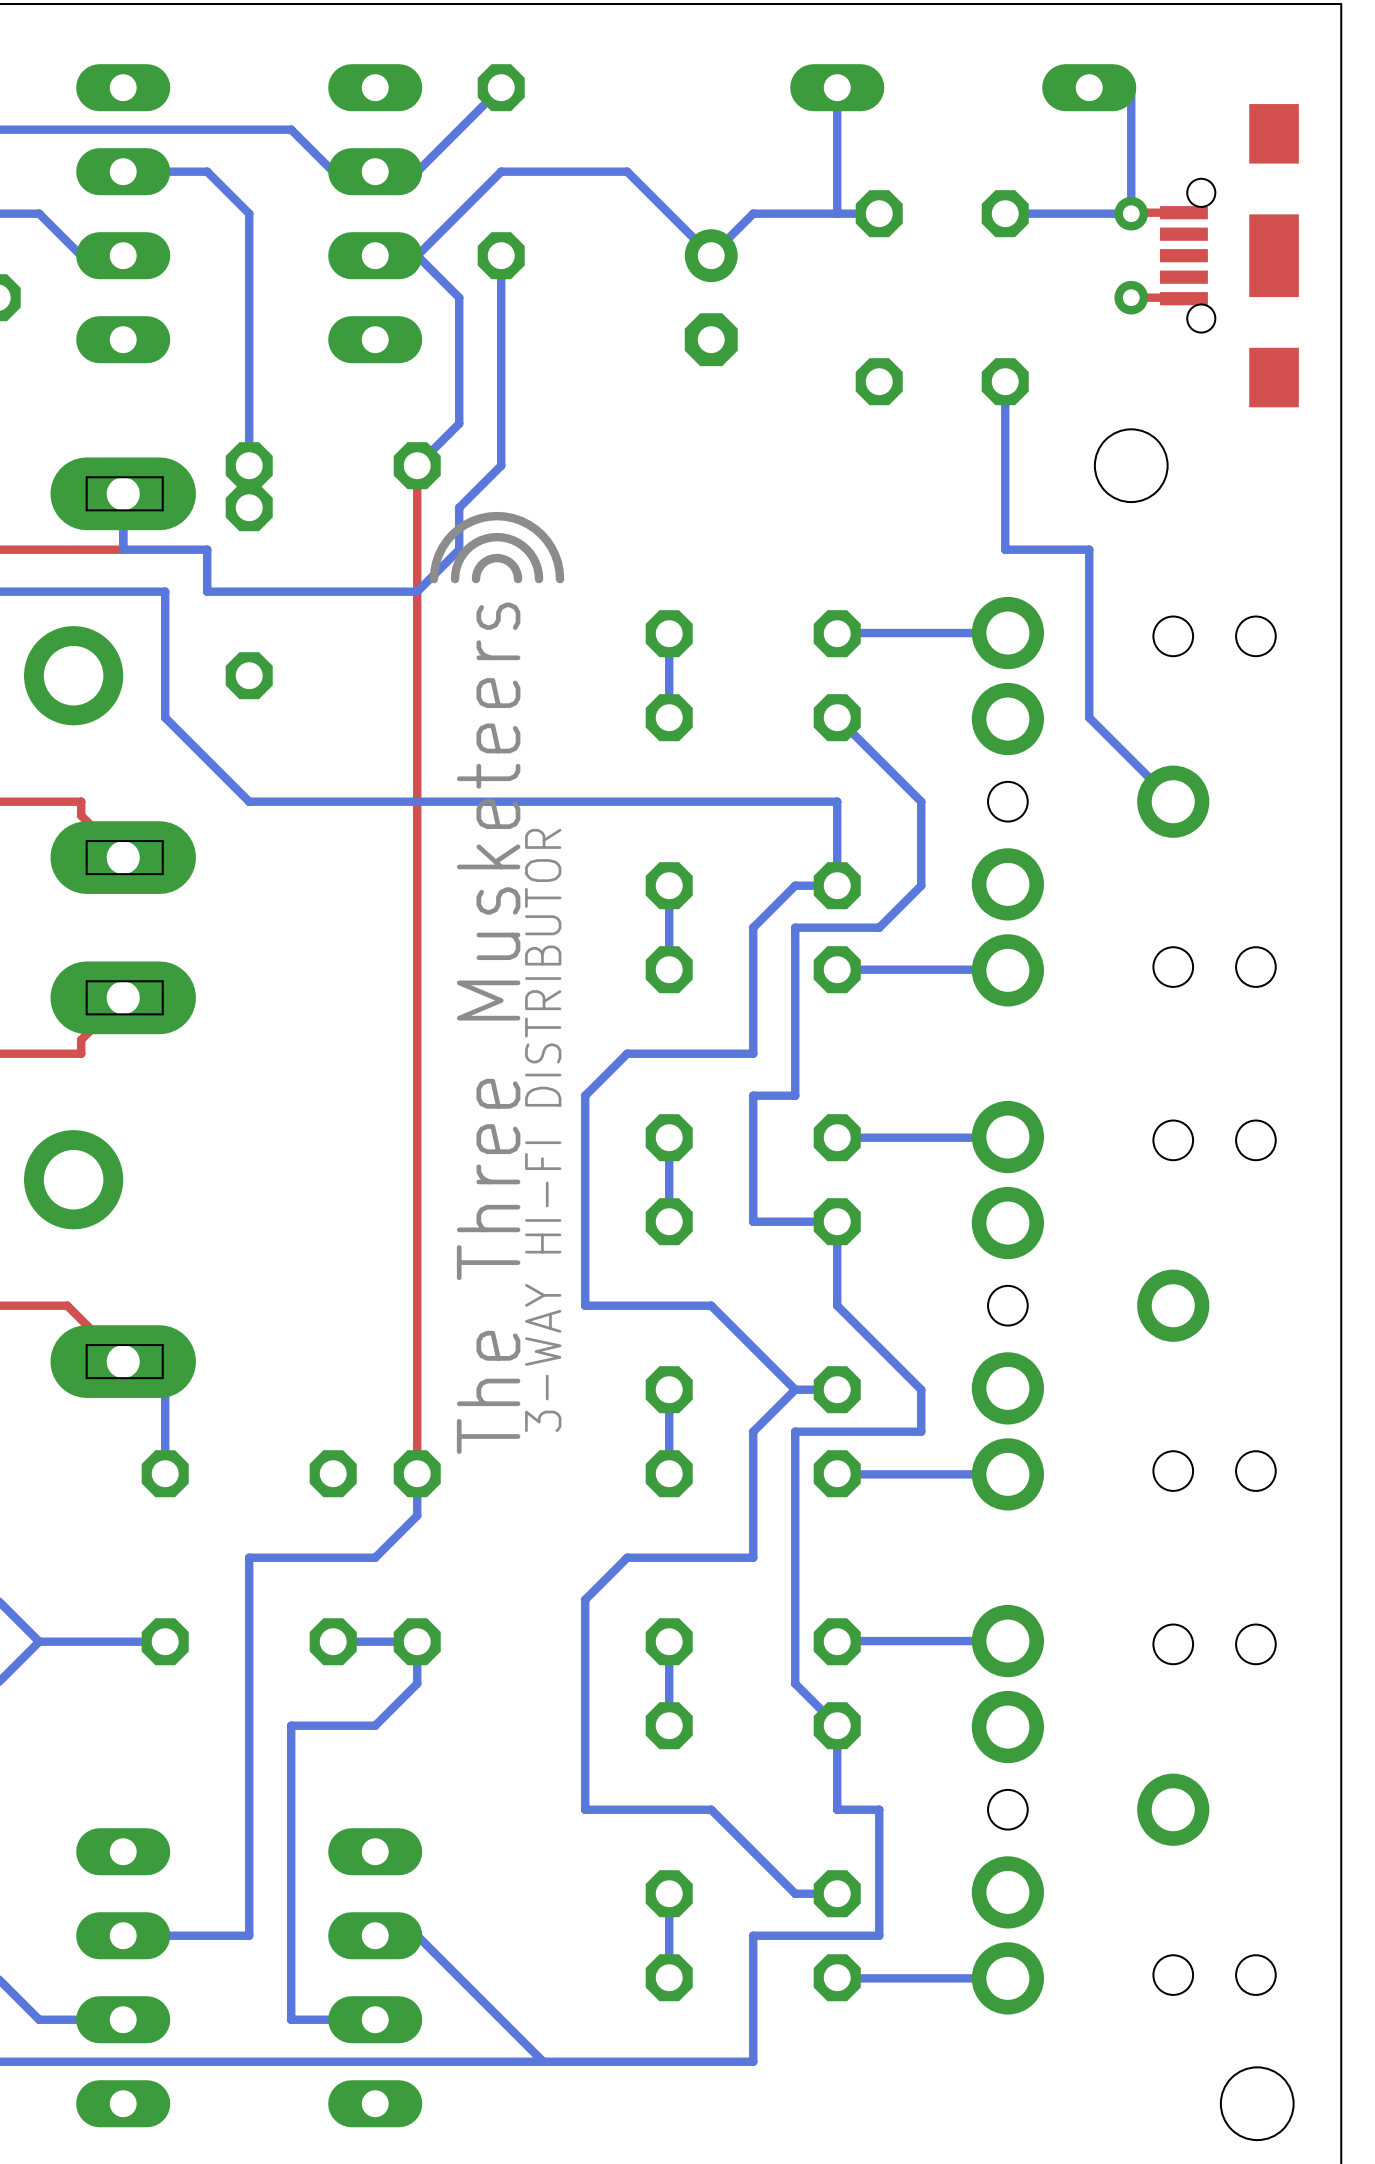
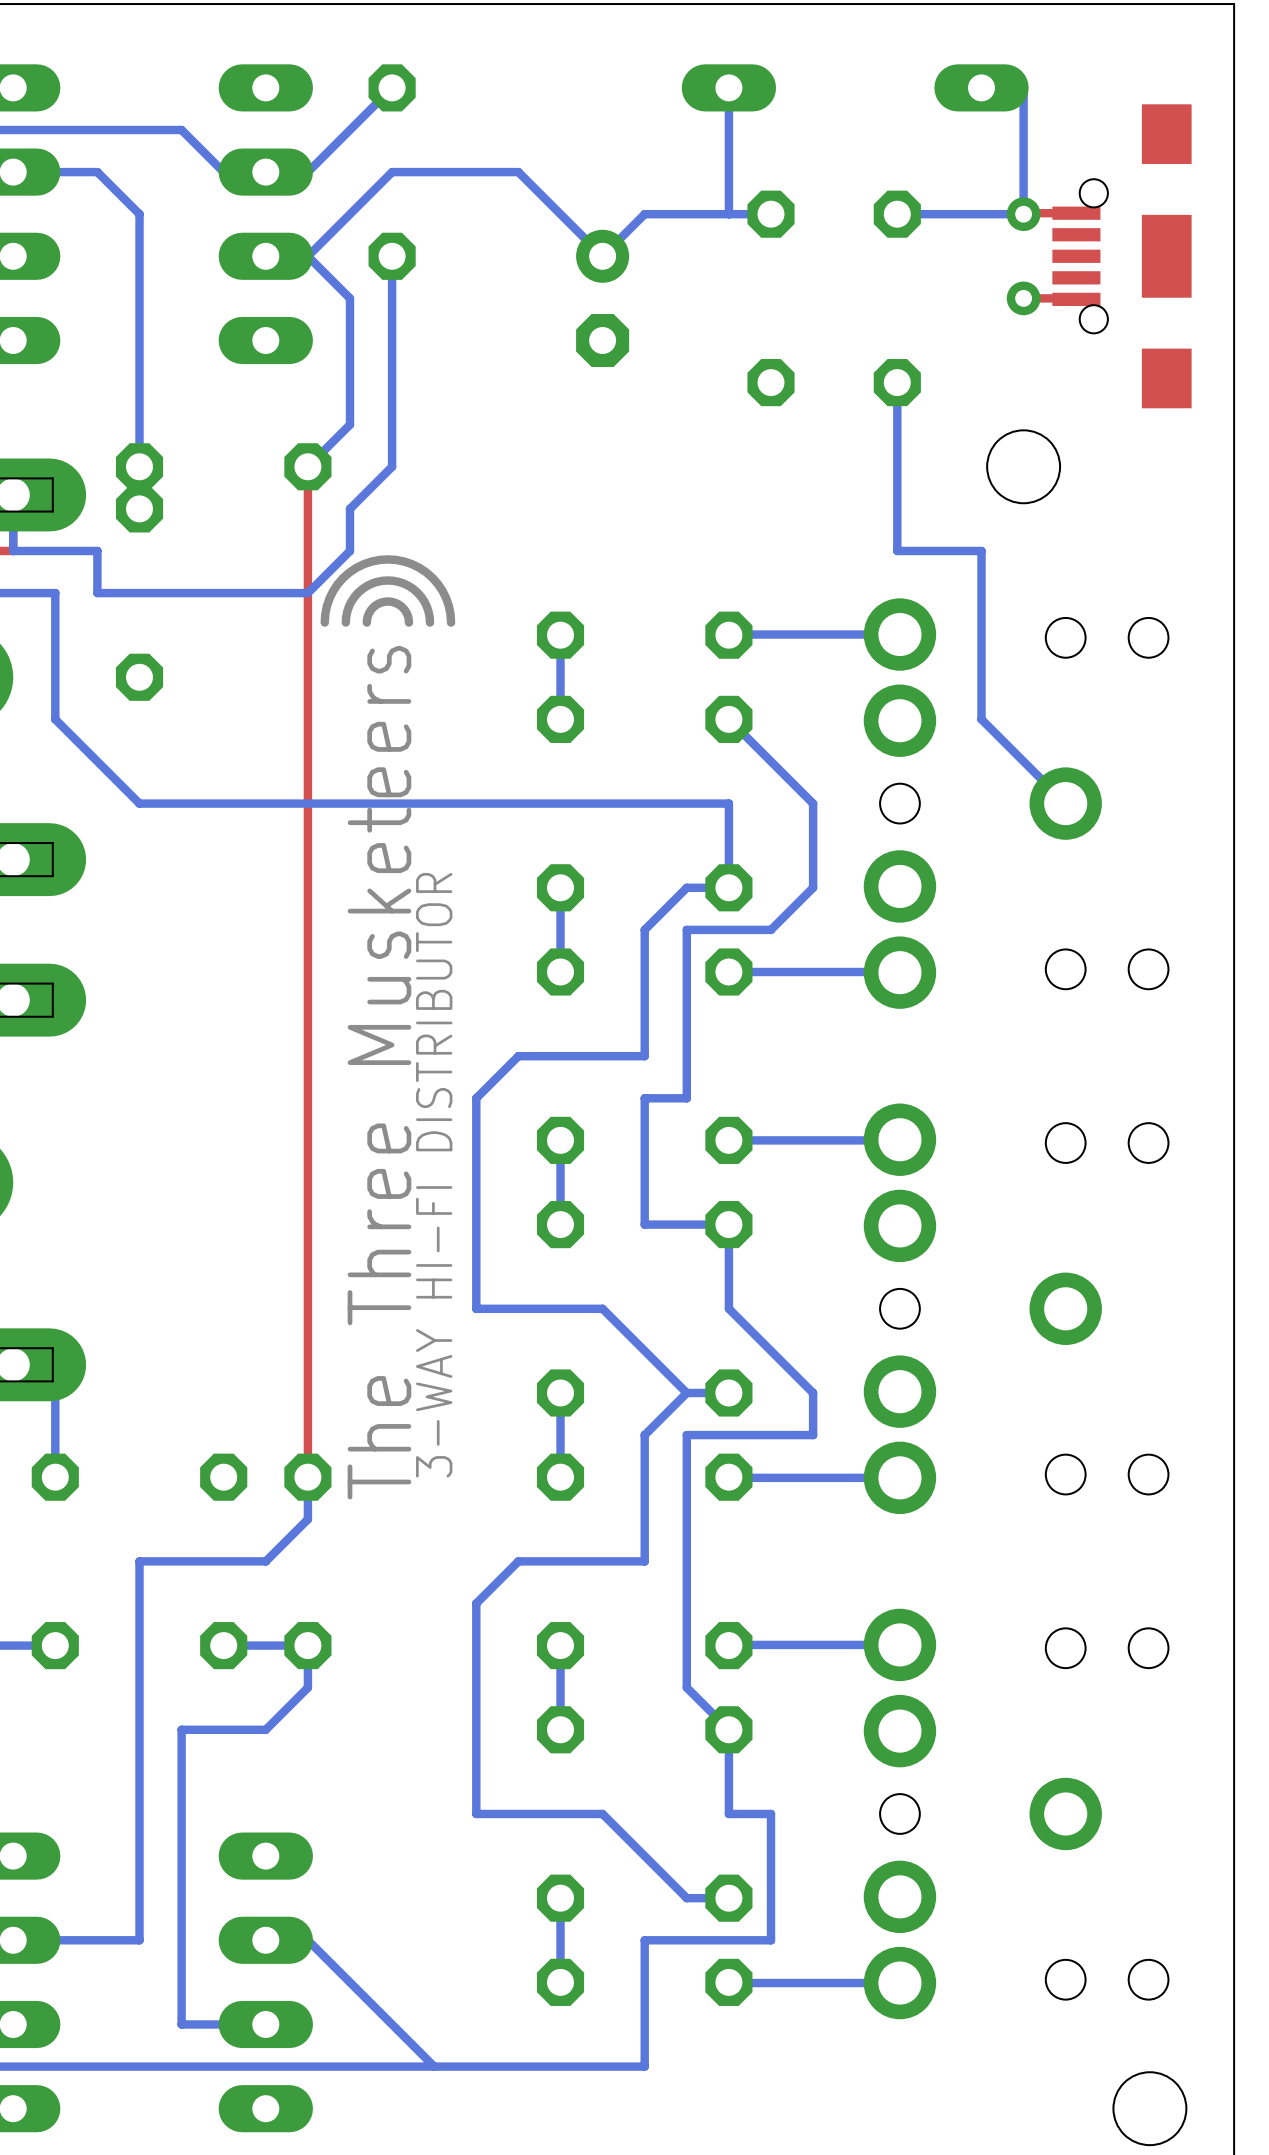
line: (518, 579) (516, 571) (511, 564) (505, 559) (497, 558) (488, 559) (482, 564) (477, 571) (476, 579) -> (408, 622) (407, 614) (402, 607) (395, 603) (387, 601) (379, 603) (373, 607) (368, 614) (366, 622)
line: (539, 579) (535, 563) (526, 549) (513, 540) (497, 537) (480, 540) (467, 549) (458, 563) (455, 579) -> (430, 622) (426, 606) (417, 592) (404, 583) (387, 580) (371, 583) (358, 592) (349, 606) (345, 622)
line: (560, 579) (555, 554) (541, 534) (521, 520) (497, 516) (472, 520) (452, 534) (438, 554) (434, 579) -> (451, 622) (446, 598) (432, 577) (412, 564) (387, 559) (363, 564) (343, 577) (329, 598) (324, 622)
text position: The Three Musketeers (488, 1028) -> The Three Musketeers (379, 1072)
text position: 3-WAY HI-FI DISTRIBUTOR (543, 1130) -> 3-WAY HI-FI DISTRIBUTOR (434, 1175)

